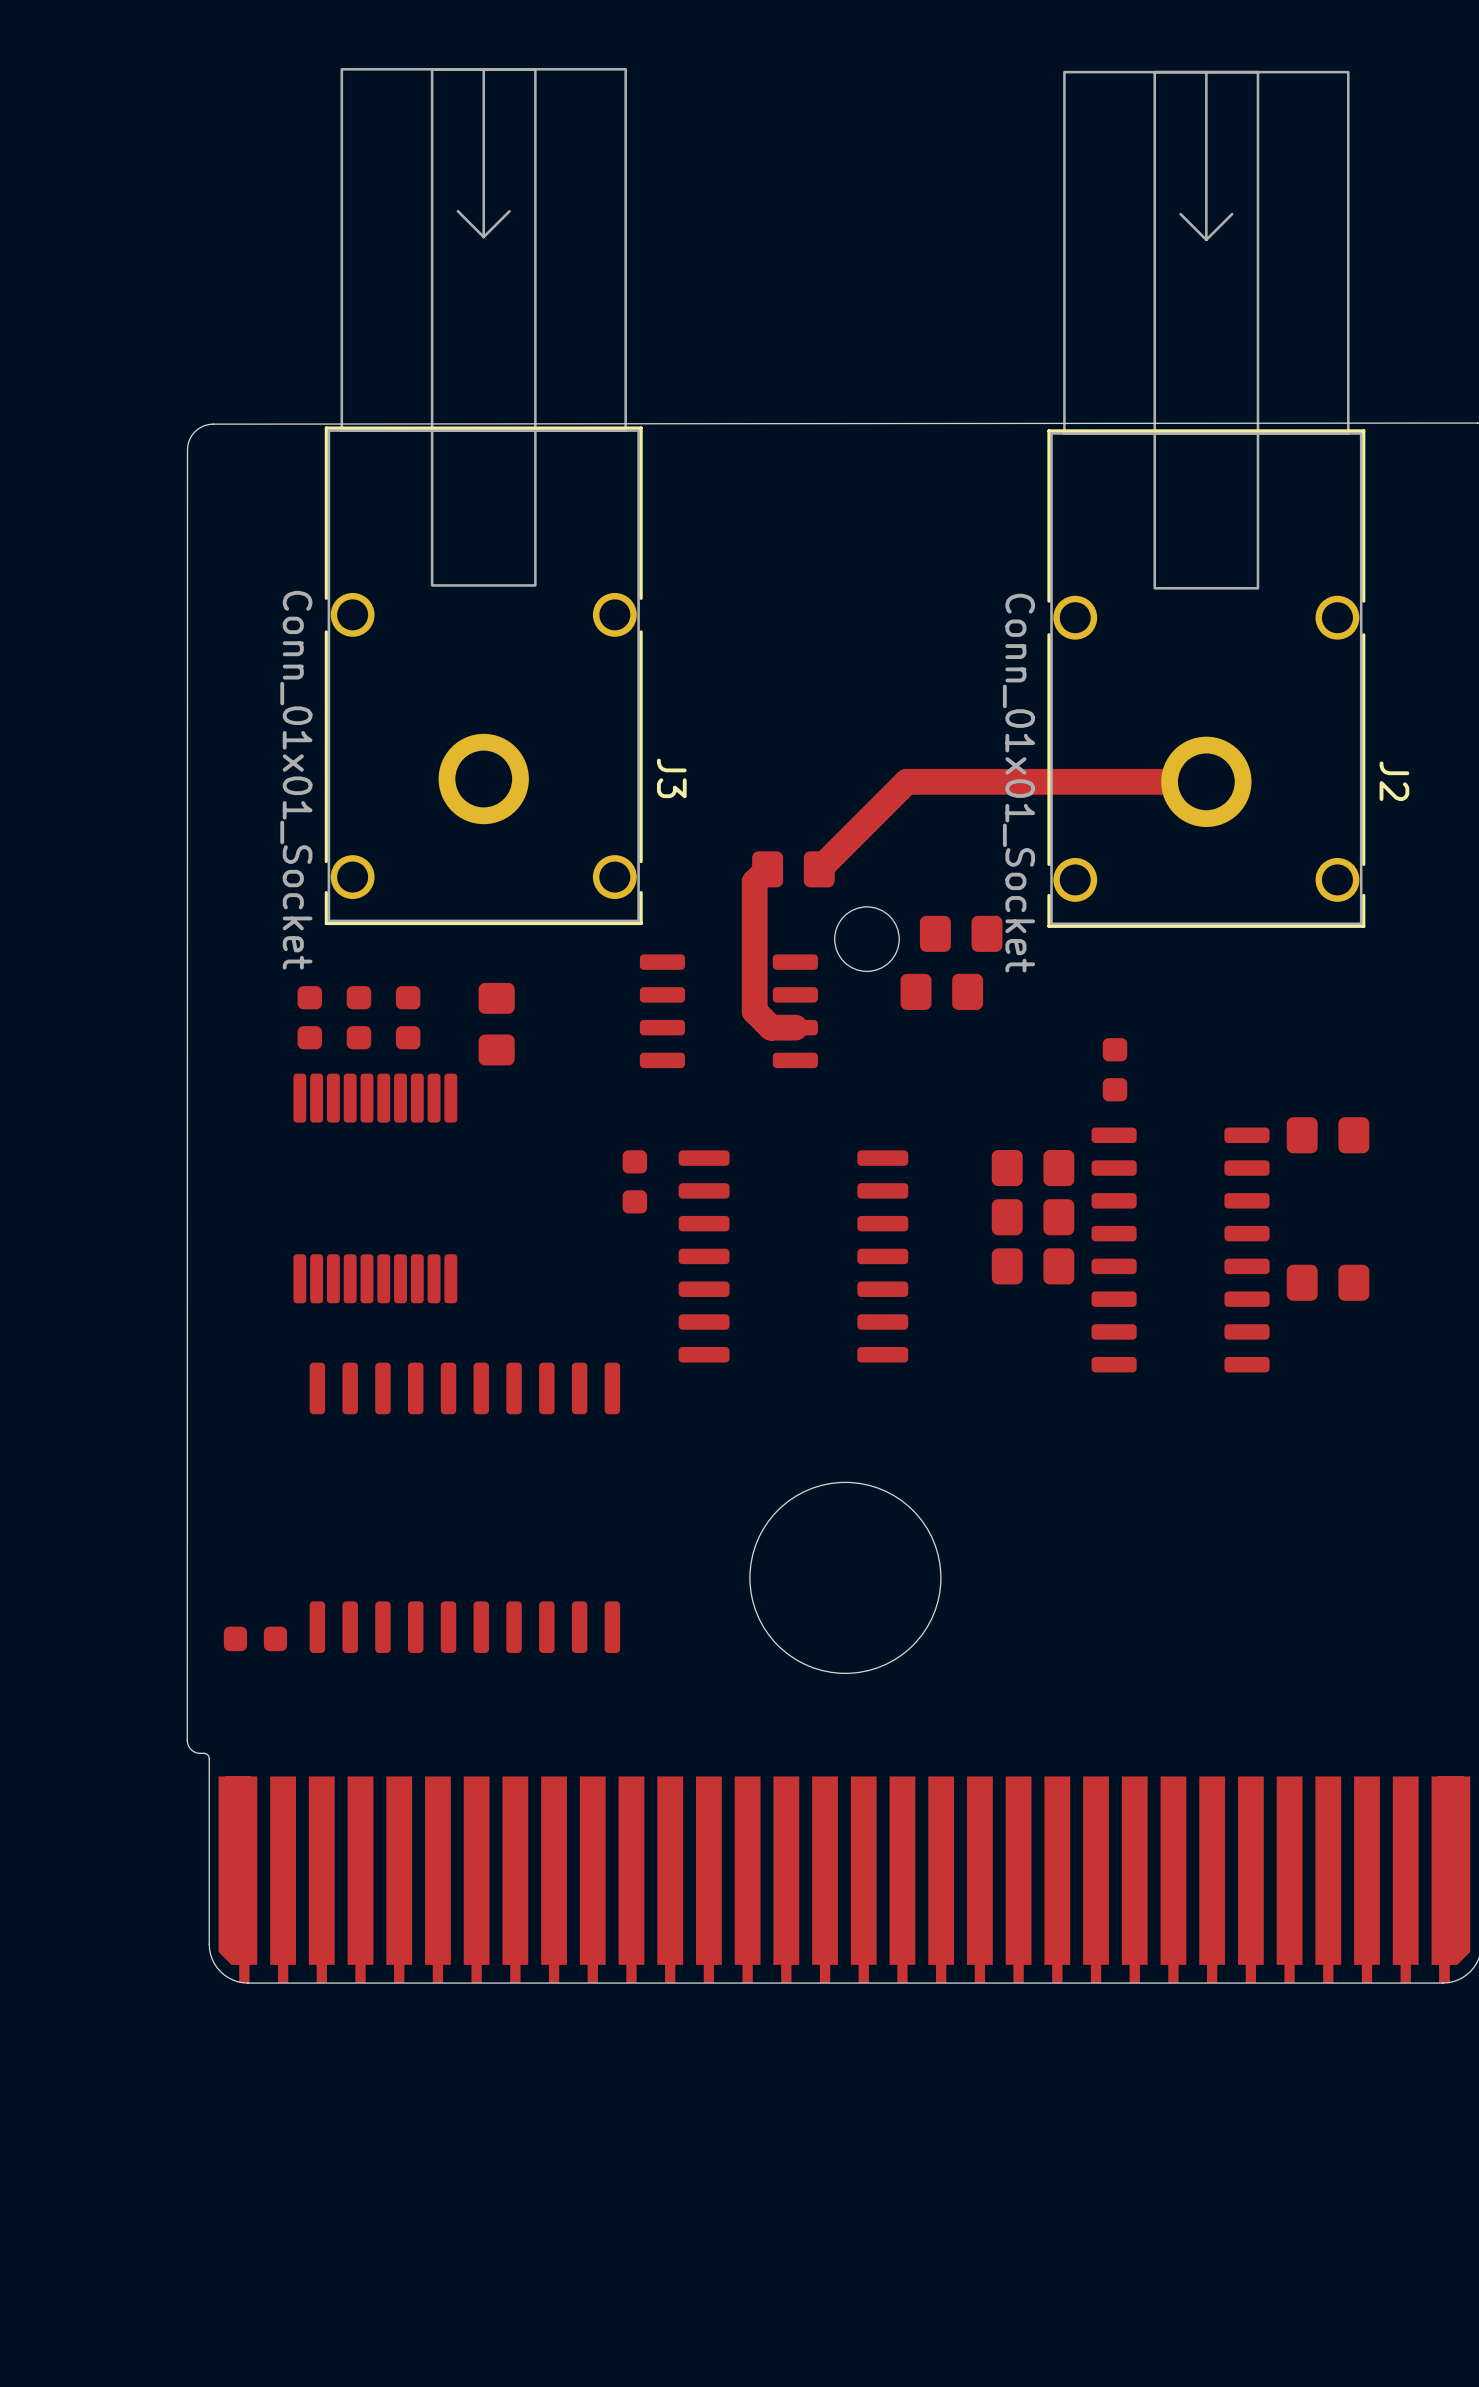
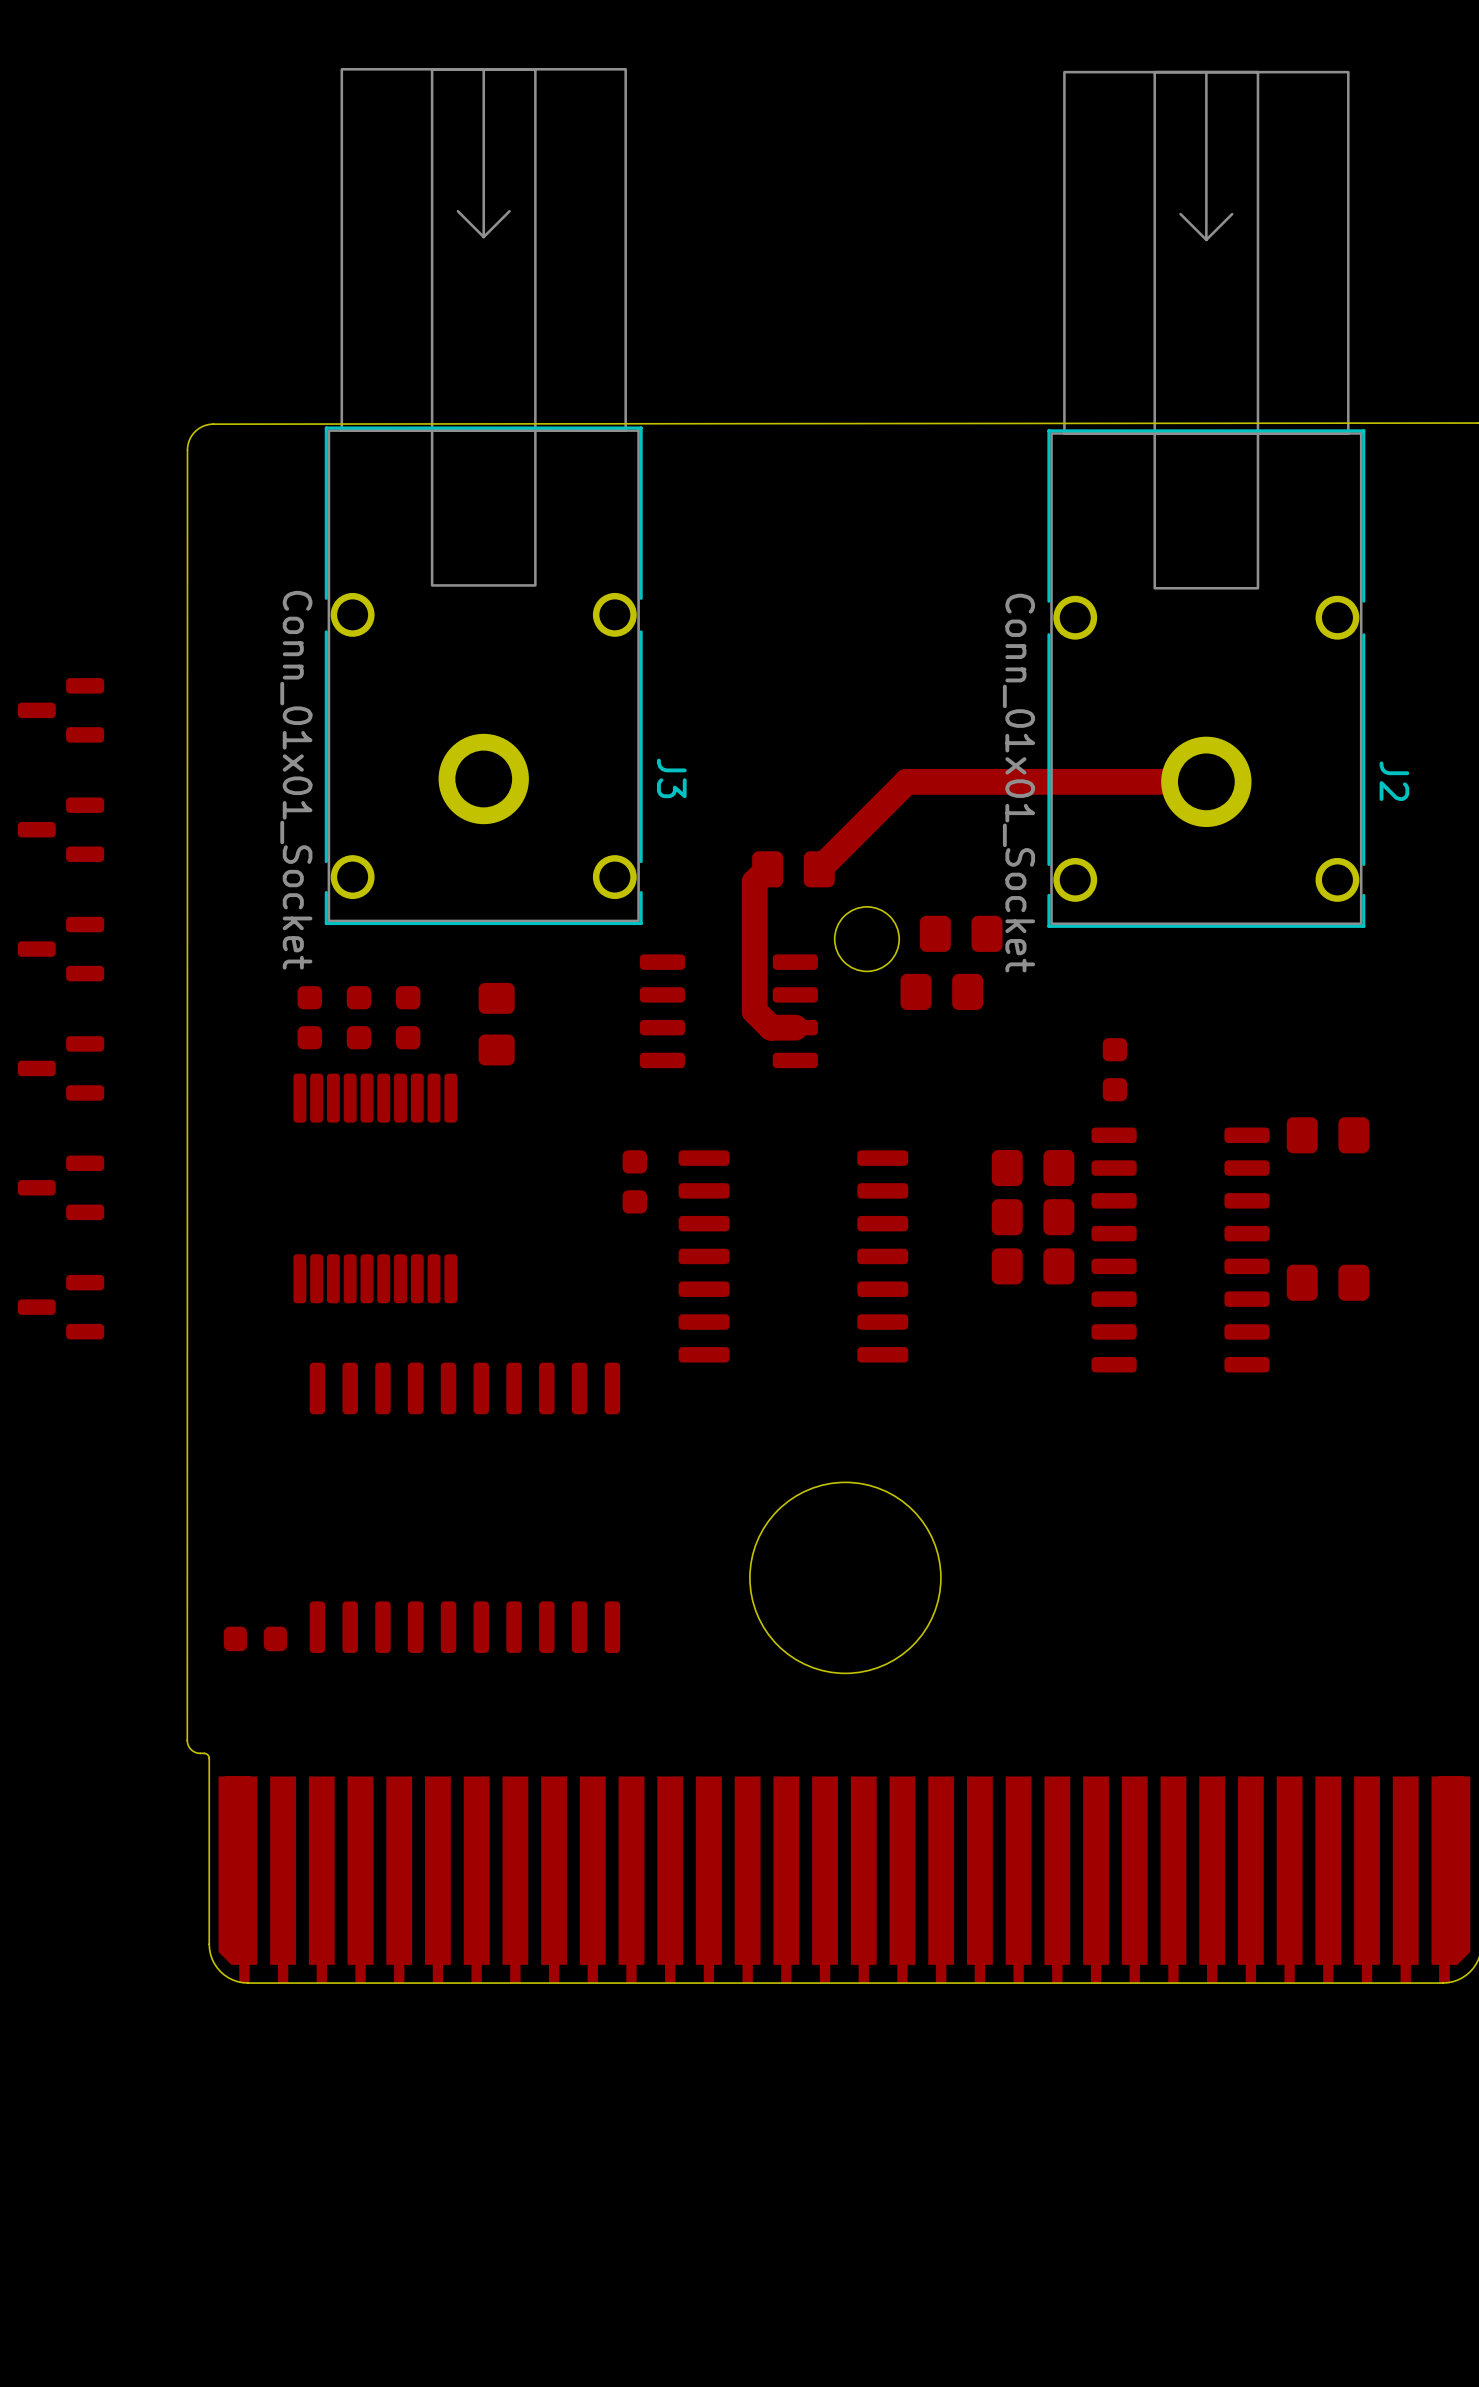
part: none -> (60, 710)
part: none -> (60, 829)
part: none -> (60, 949)
part: none -> (60, 1068)
part: none -> (60, 1187)
part: none -> (60, 1307)

